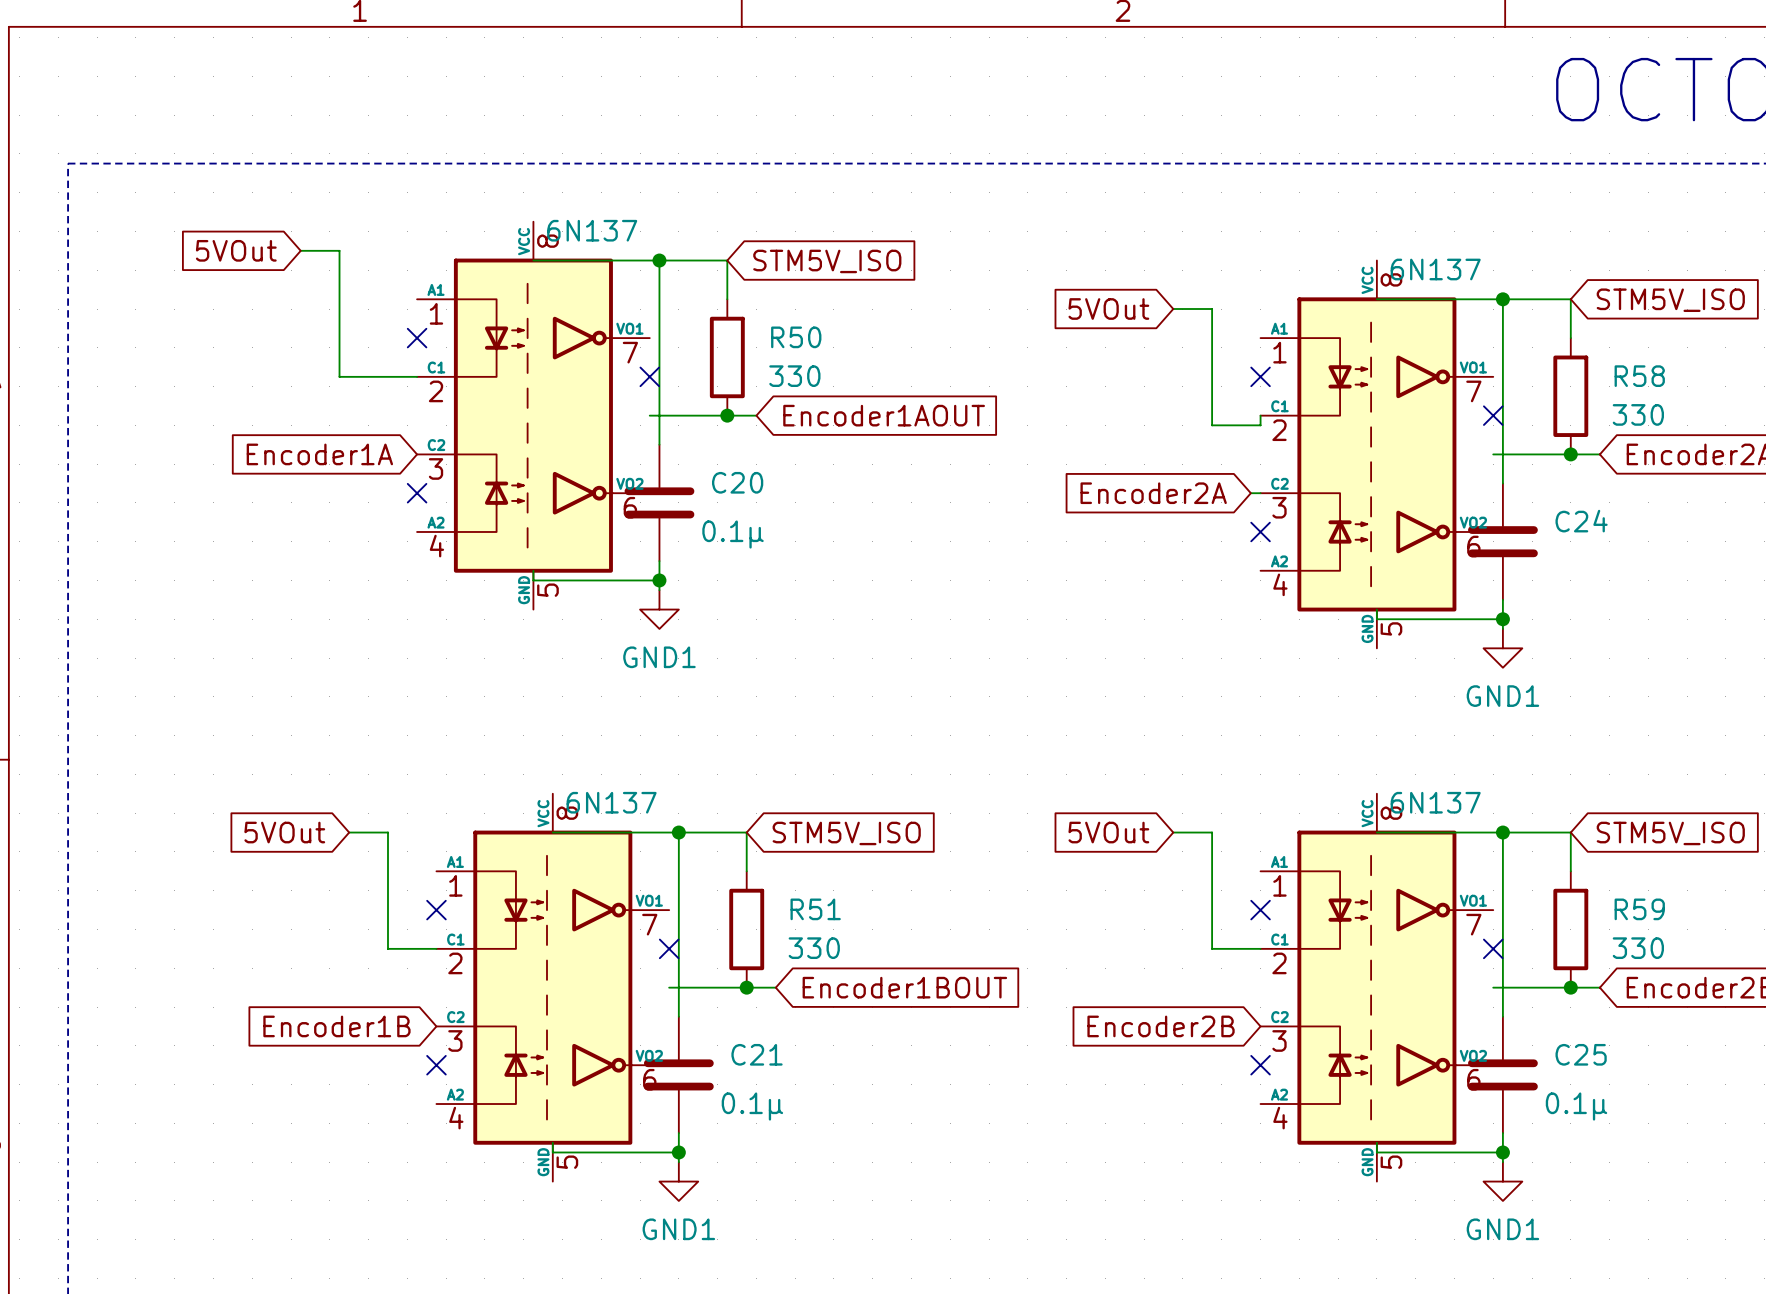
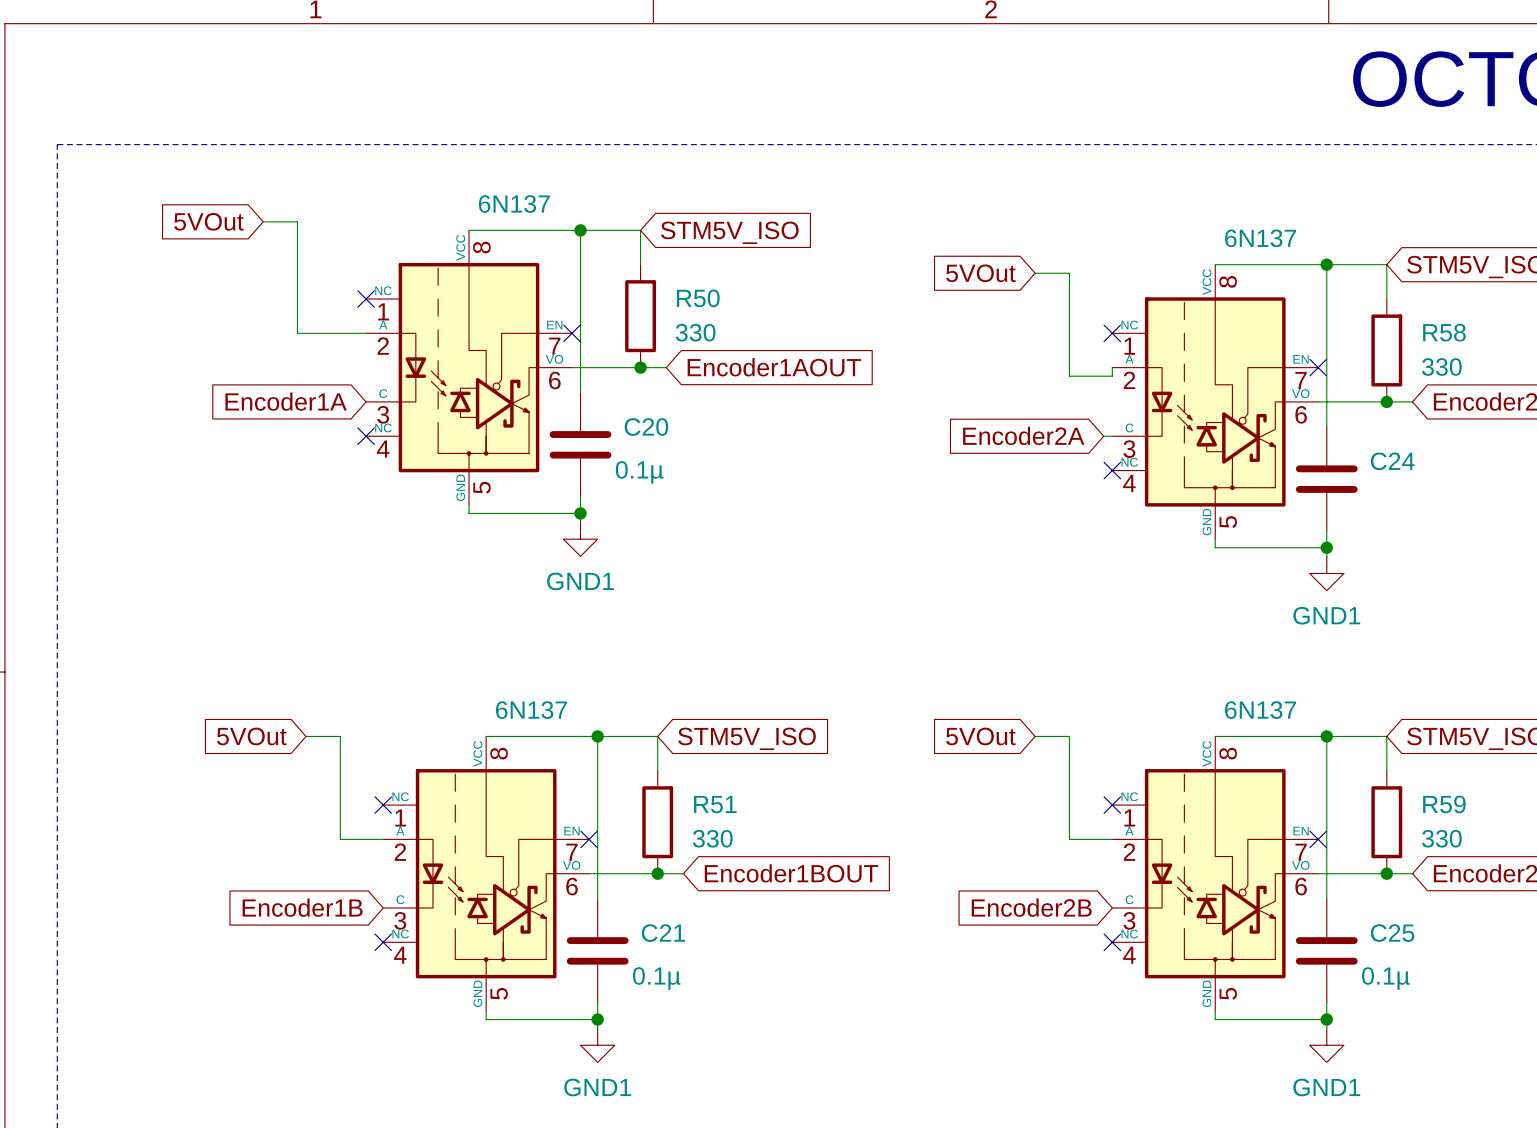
part symbol: [417, 221, 650, 610] -> [366, 230, 572, 505]
part symbol: [1260, 260, 1494, 649] -> [1112, 264, 1319, 540]
part symbol: [436, 793, 670, 1182] -> [383, 736, 590, 1011]
part symbol: [1260, 793, 1494, 1182] -> [1112, 736, 1319, 1011]

